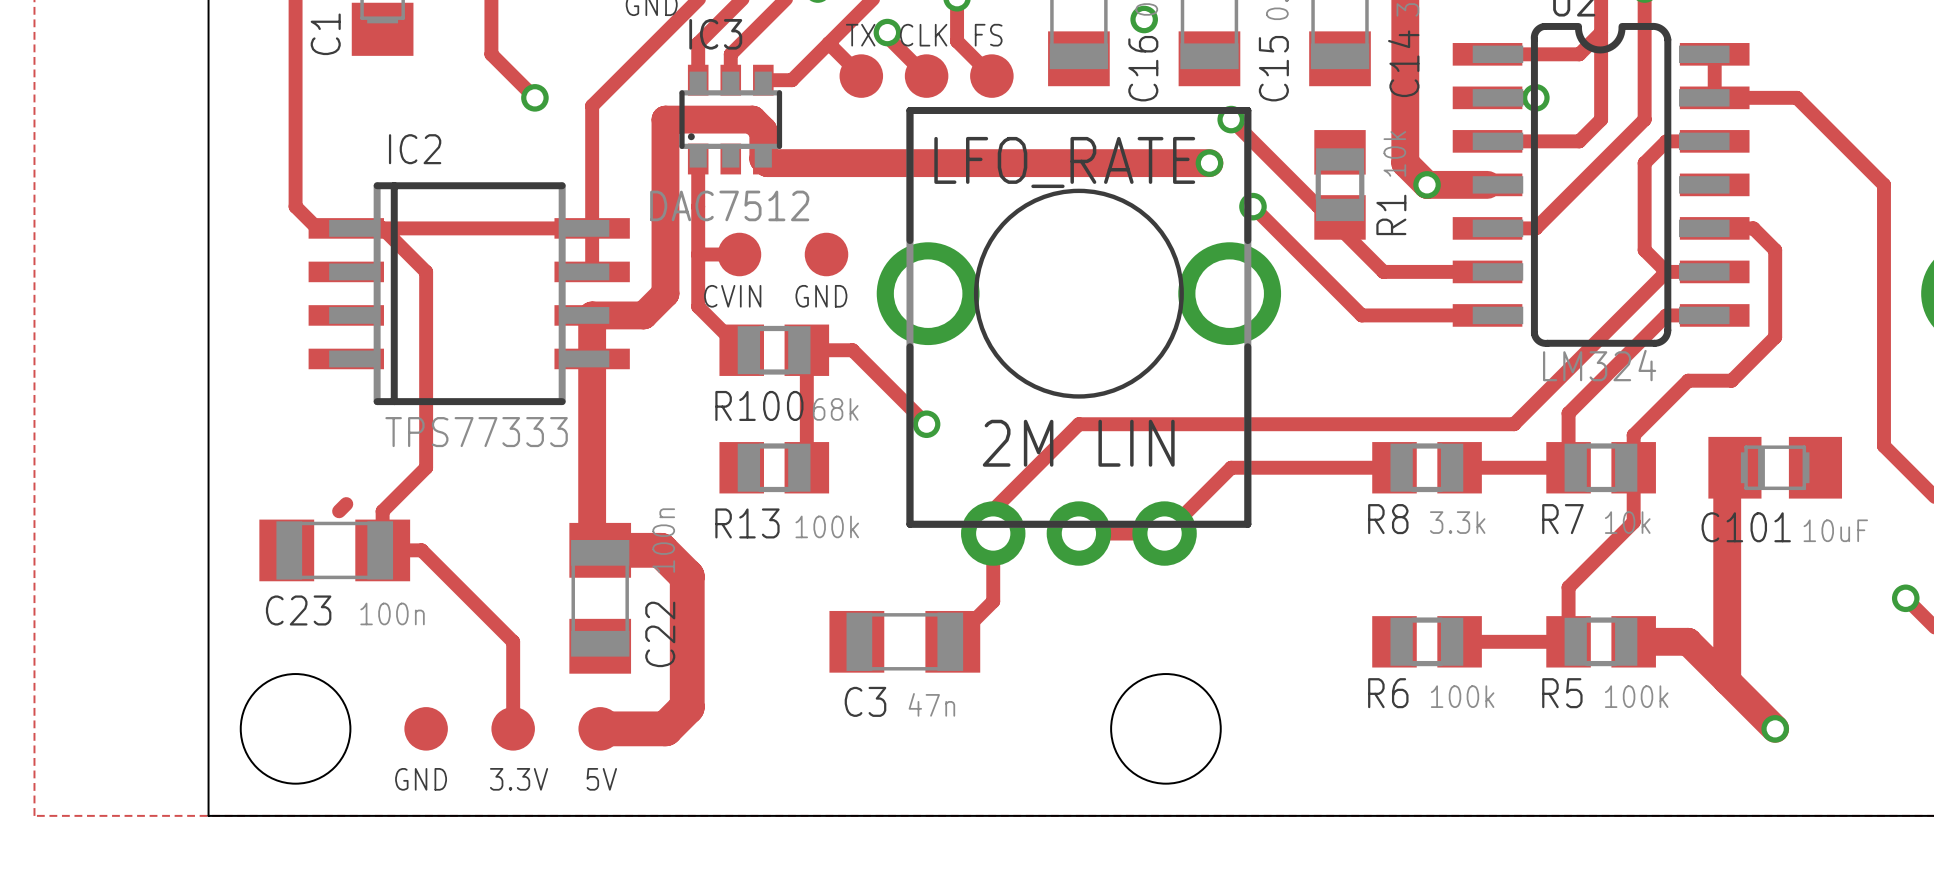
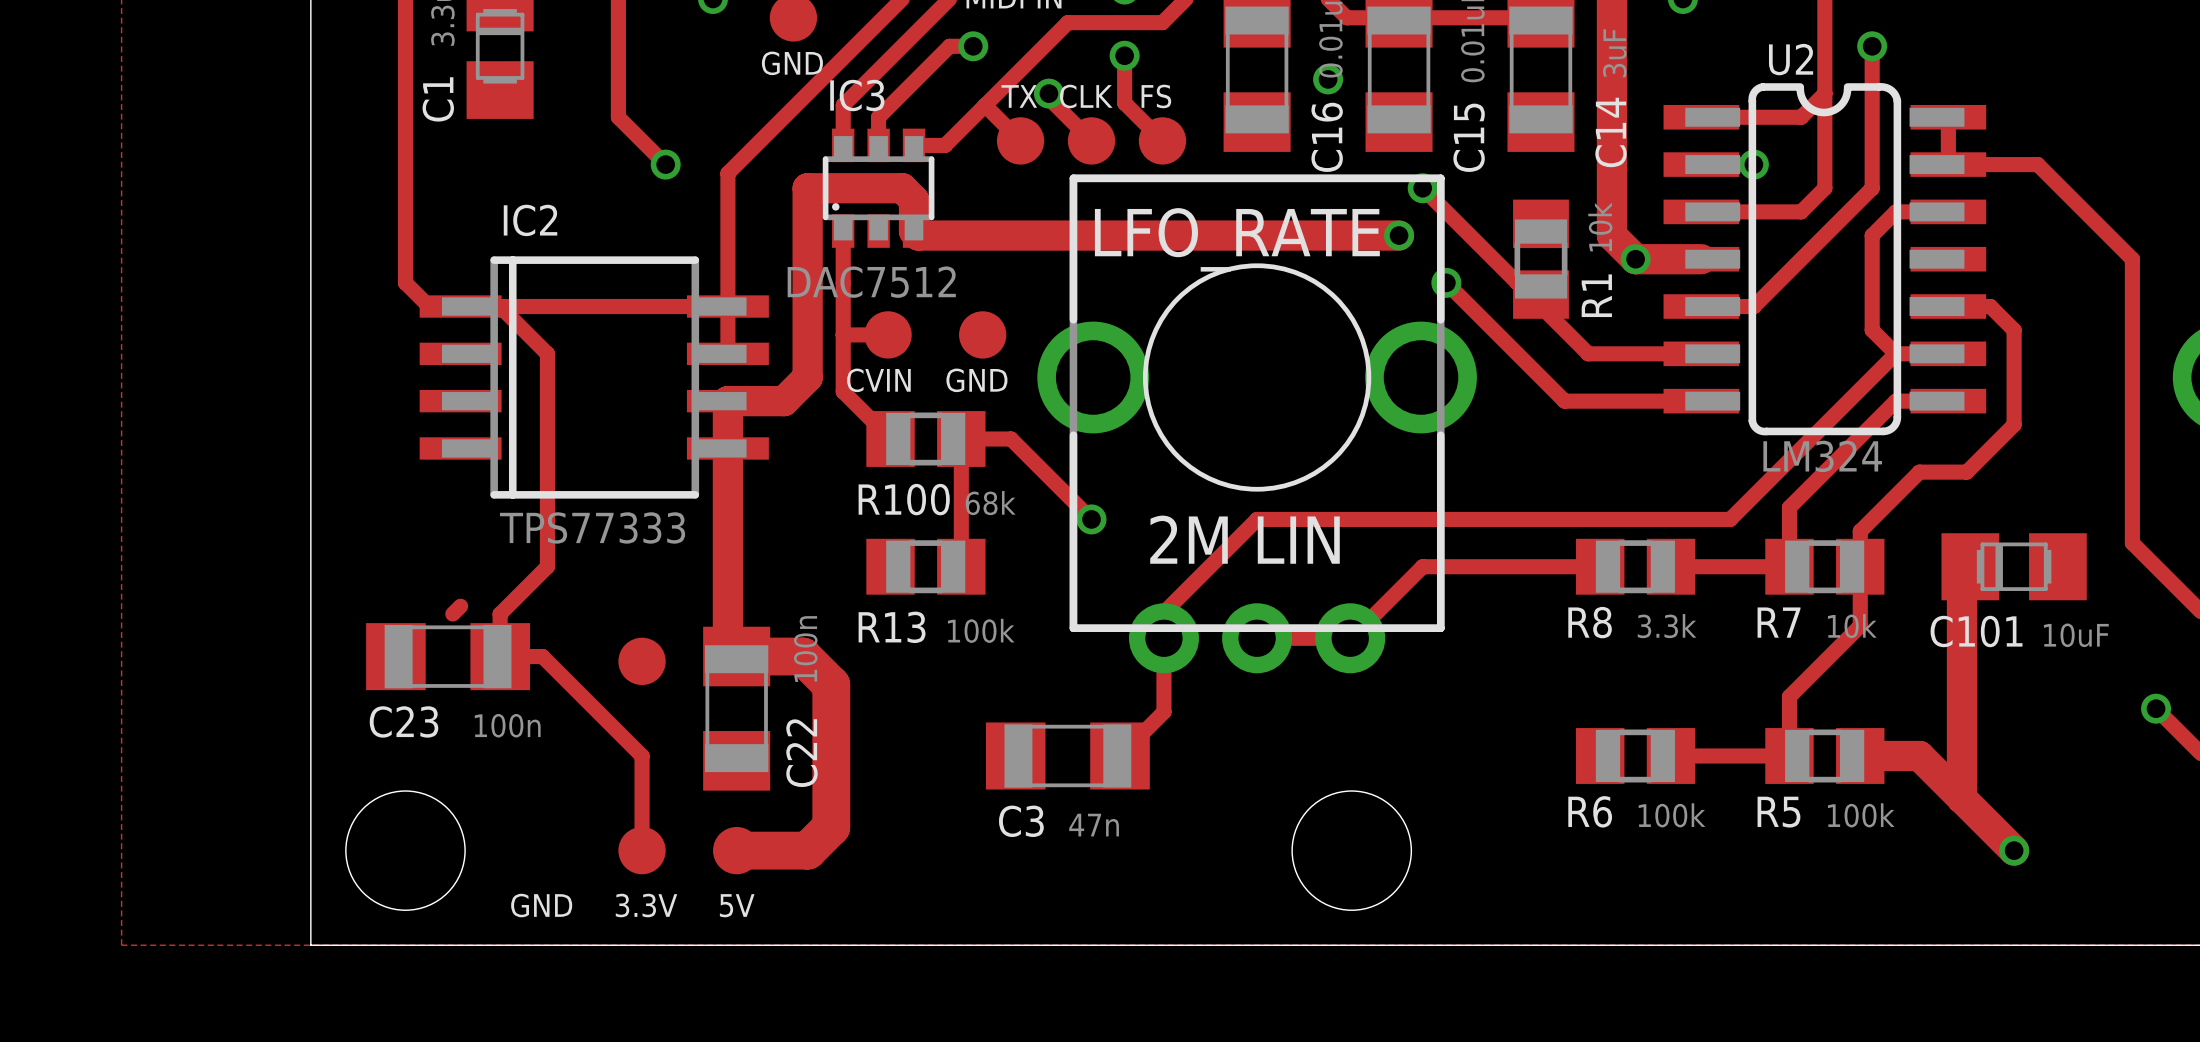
part position: (426, 728) -> (642, 661)

